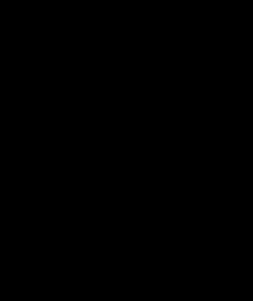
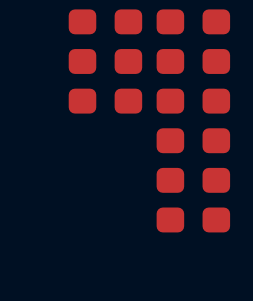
part: none -> (105, 21)
part: none -> (193, 21)
part: none -> (105, 61)
part: none -> (193, 61)
part: none -> (105, 101)
part: none -> (193, 101)
part: none -> (193, 140)
part: none -> (193, 180)
part: none -> (193, 219)

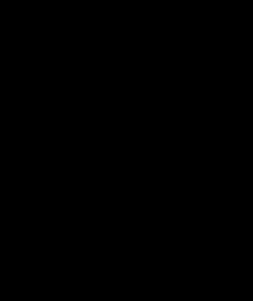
part: (105, 21) -> none
part: (193, 21) -> none
part: (105, 61) -> none
part: (193, 61) -> none
part: (105, 101) -> none
part: (193, 101) -> none
part: (193, 140) -> none
part: (193, 180) -> none
part: (193, 219) -> none

